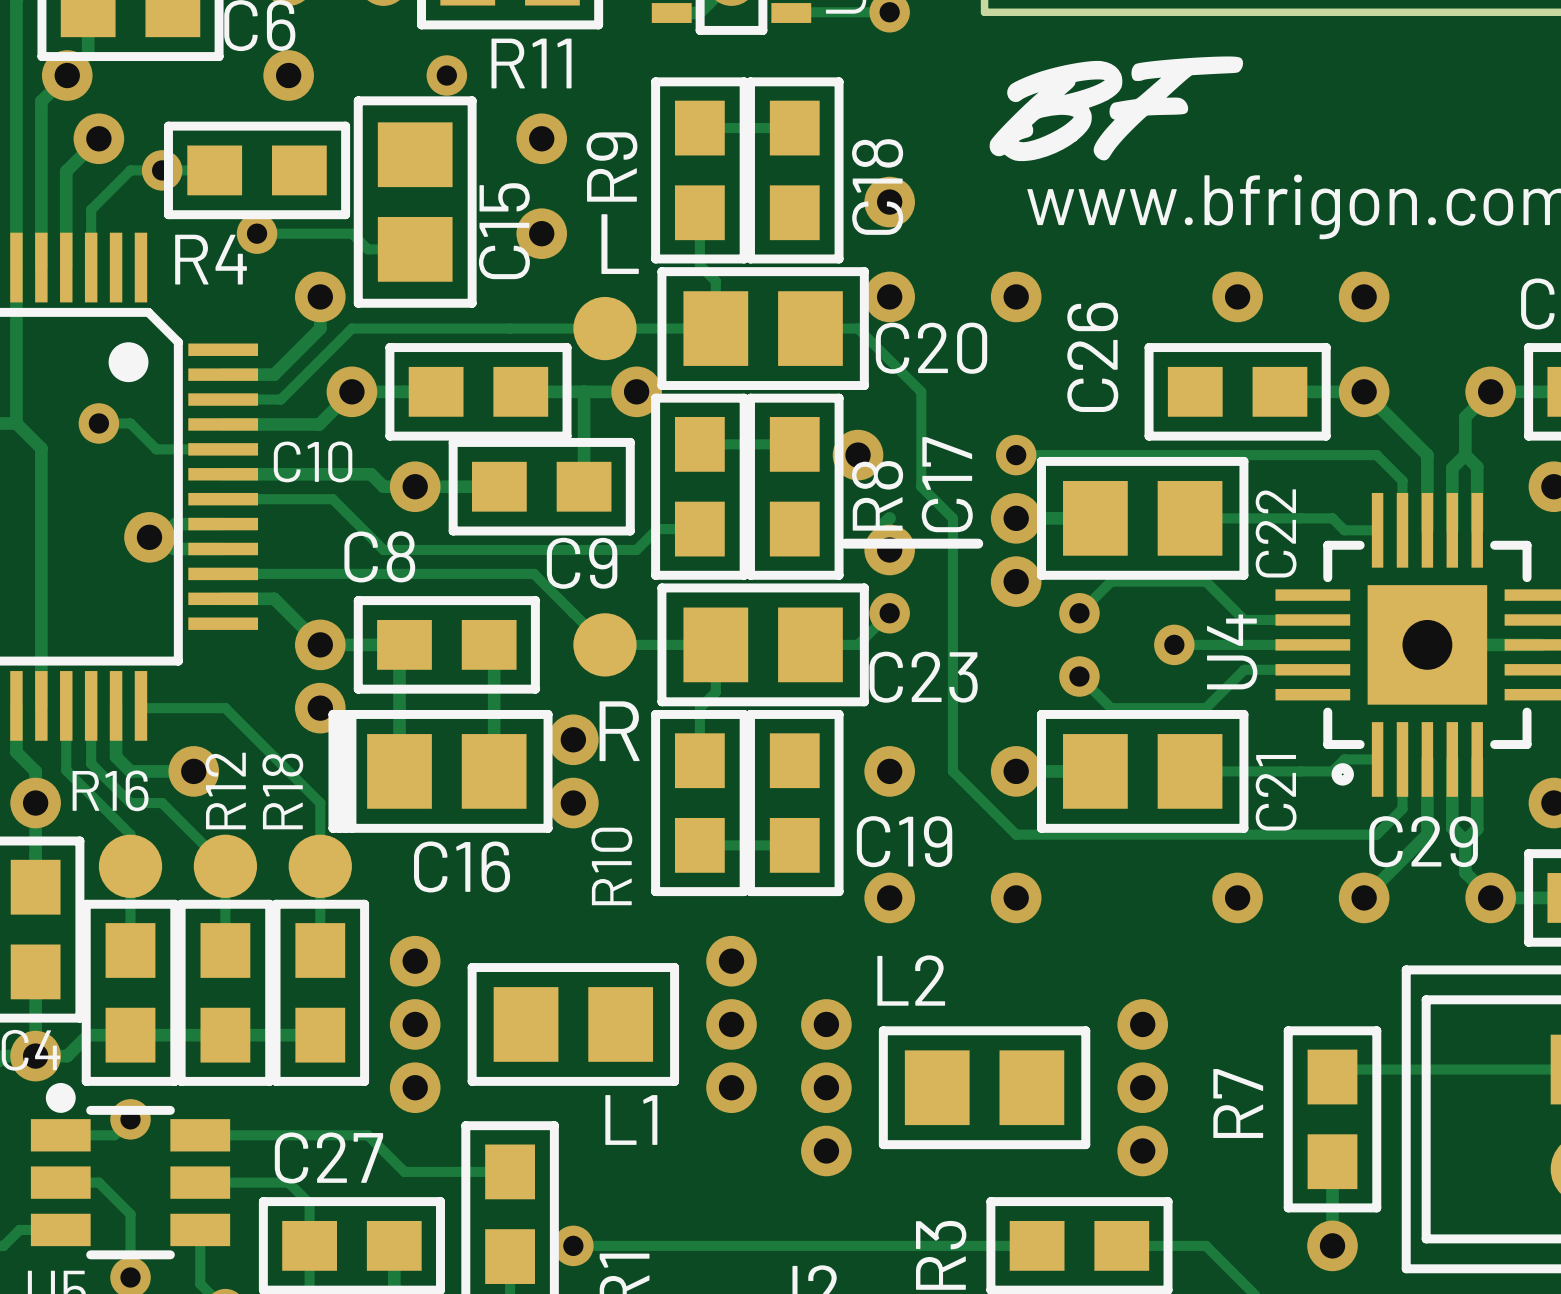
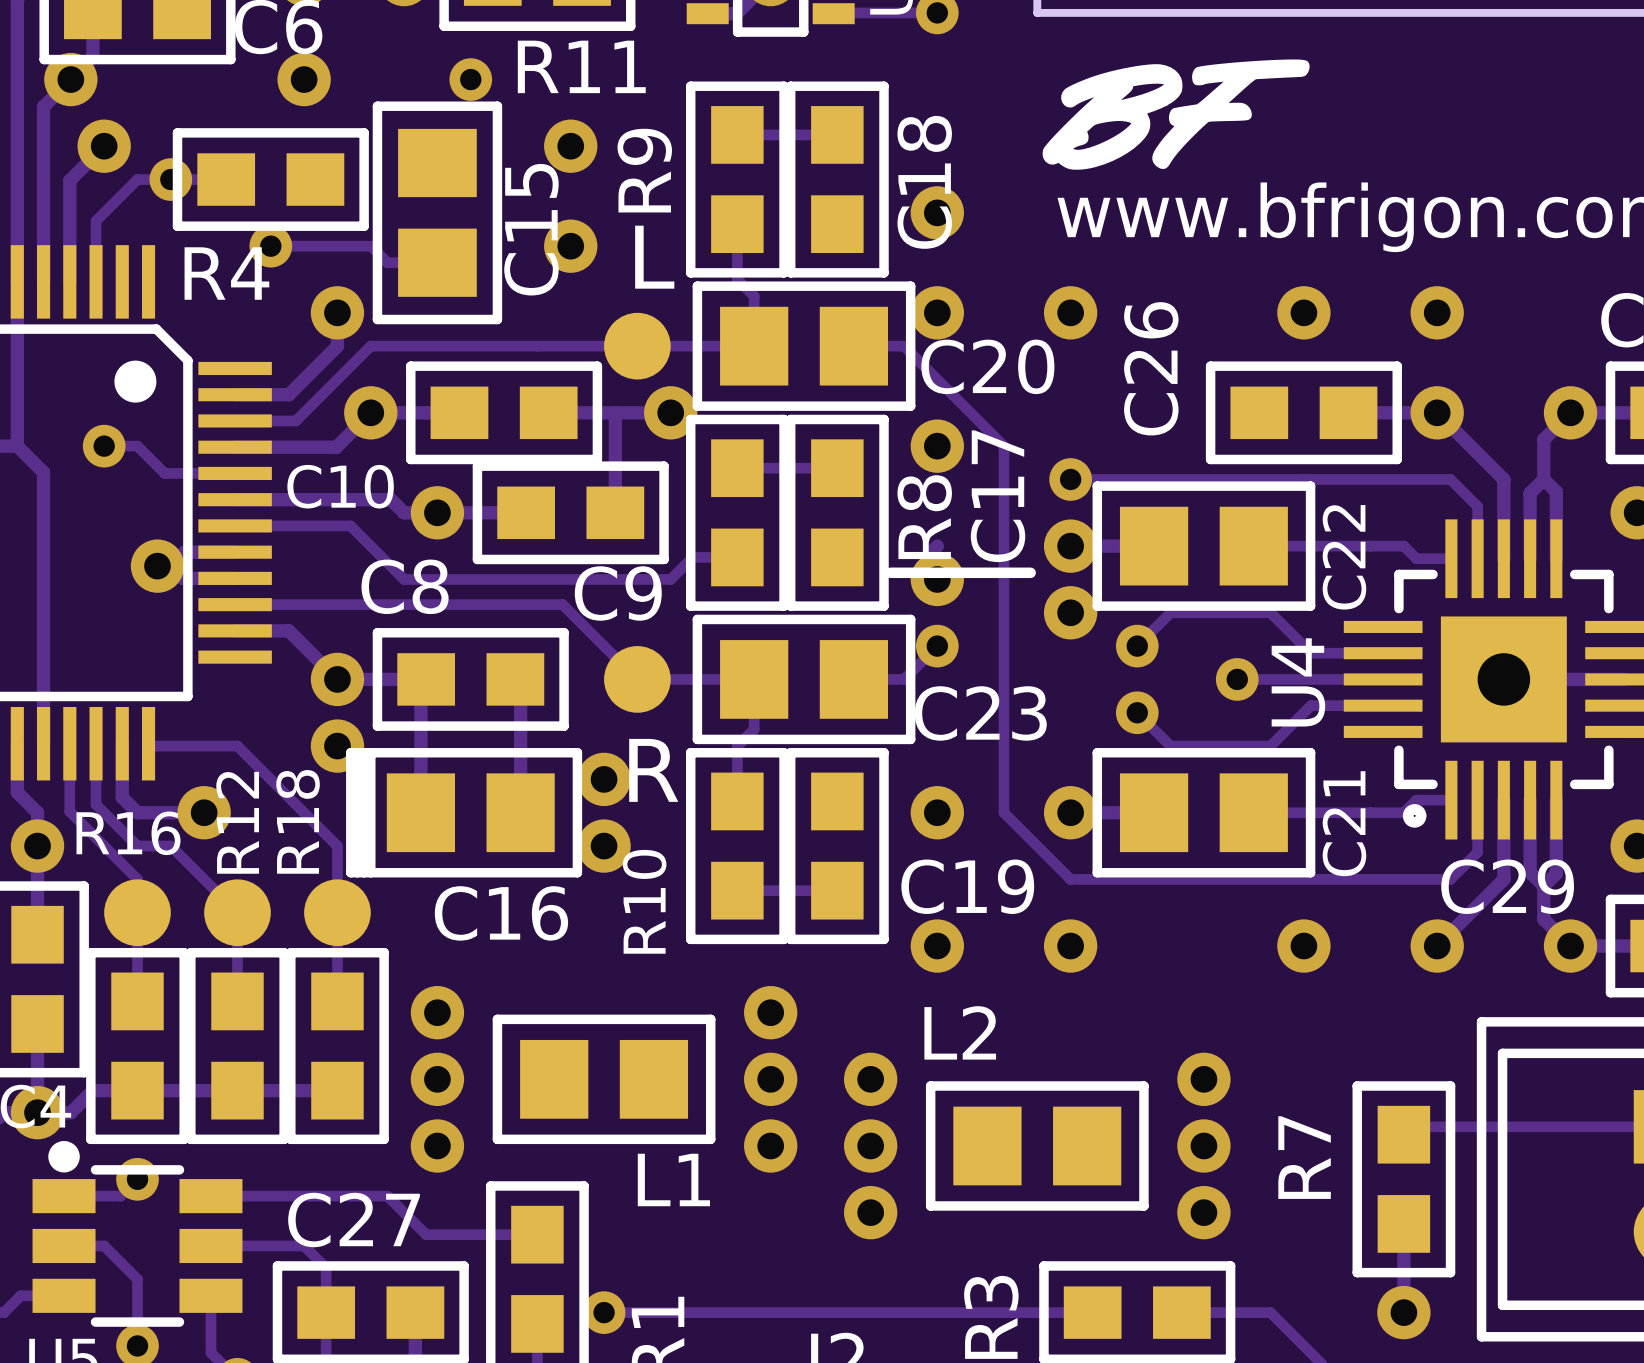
track: (921, 391) (921, 486) (952, 518) -> (970, 412) (1003, 446) (1003, 546)
via position: (858, 455) -> (937, 446)

